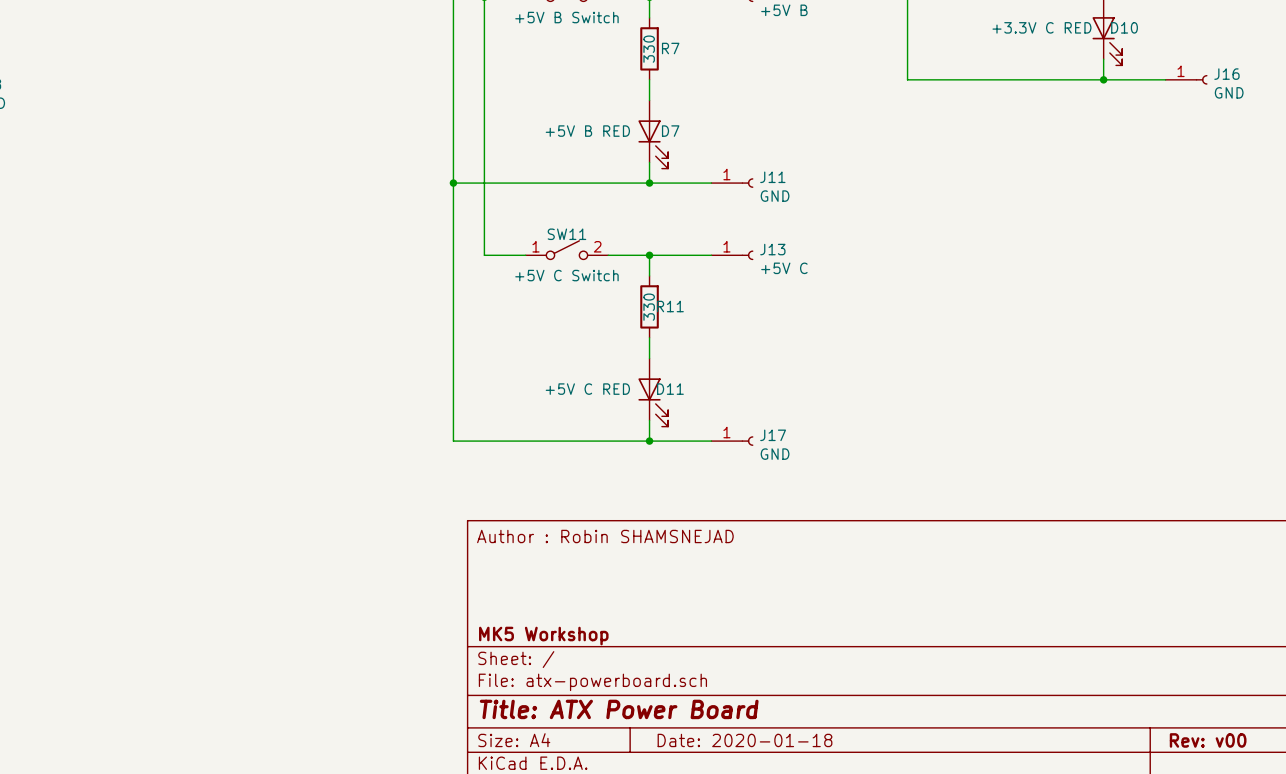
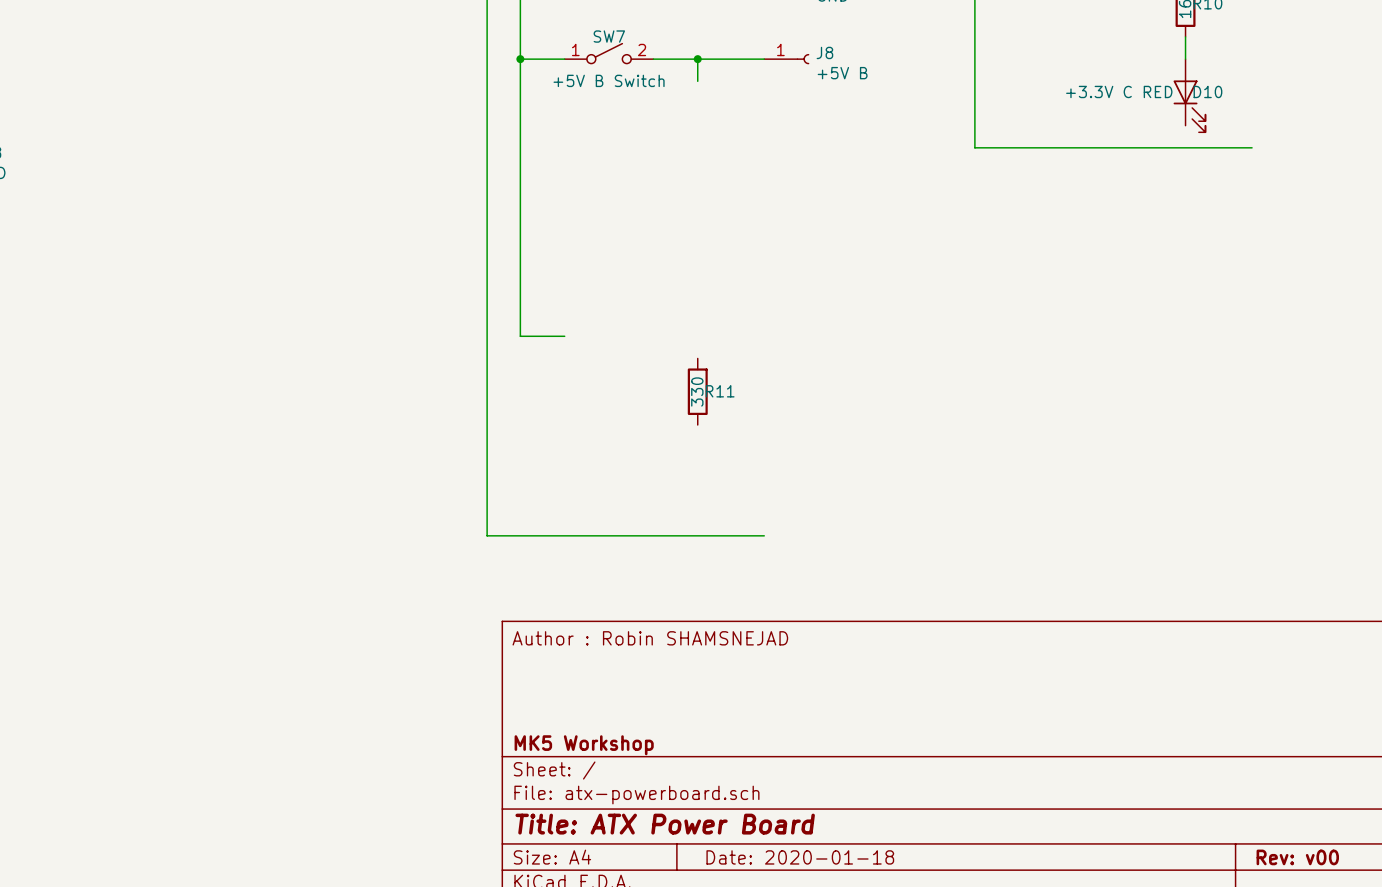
R7: 330 (649, 48) -> none
wire: (1103, 59) (1103, 79) -> none
wire: (649, 79) (649, 100) -> none
junction: (1103, 79) -> none
J16: GND (1186, 79) -> none
D7: +5V B RED (653, 134) -> none
wire: (649, 162) (649, 183) -> none
wire: (453, 183) (711, 183) -> none
junction: (453, 183) -> none
junction: (649, 183) -> none
J11: GND (732, 183) -> none
SW11: +5V C Switch (566, 250) -> none
wire: (608, 255) (711, 255) -> none
wire: (649, 255) (649, 275) -> none
junction: (649, 255) -> none
J13: +5V C (732, 255) -> none
wire: (649, 337) (649, 358) -> none
D11: +5V C RED (653, 392) -> none
wire: (649, 420) (649, 441) -> none
junction: (649, 441) -> none
J17: GND (732, 441) -> none

